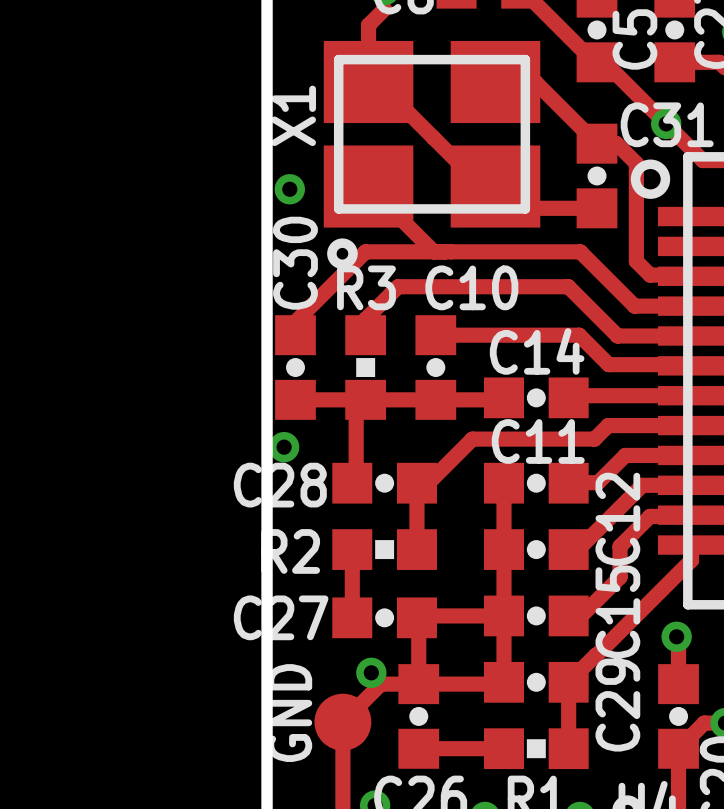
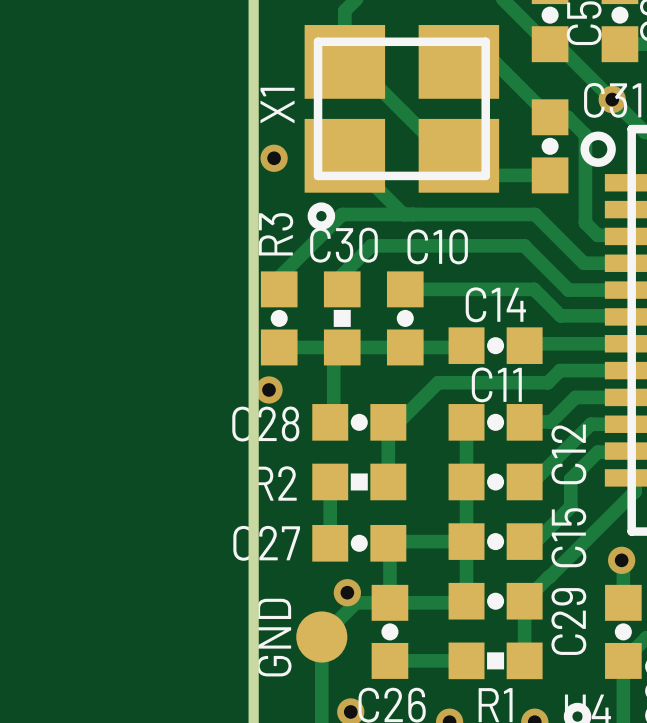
C30 name rotation: 0° (295, 263) -> 90° clockwise (343, 245)
R3 name rotation: 0° (366, 287) -> 90° counterclockwise (275, 234)

